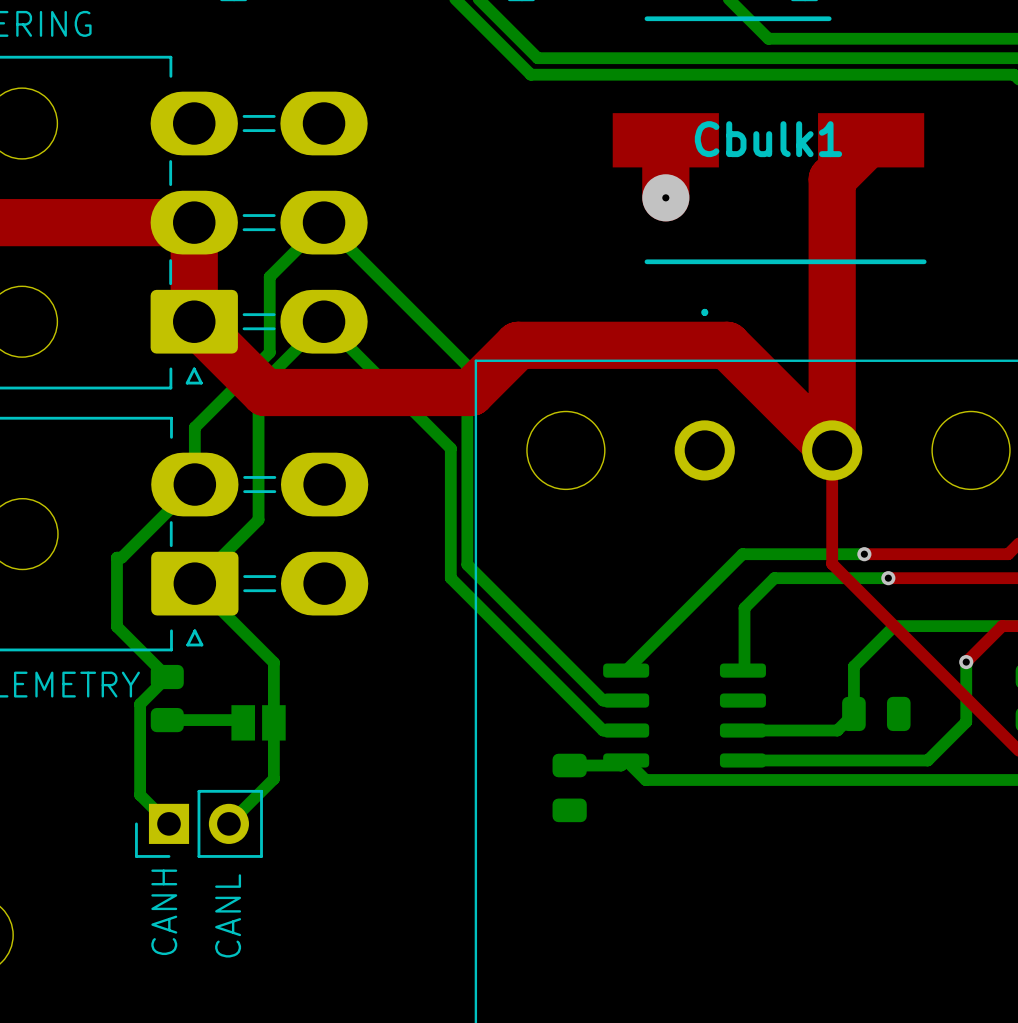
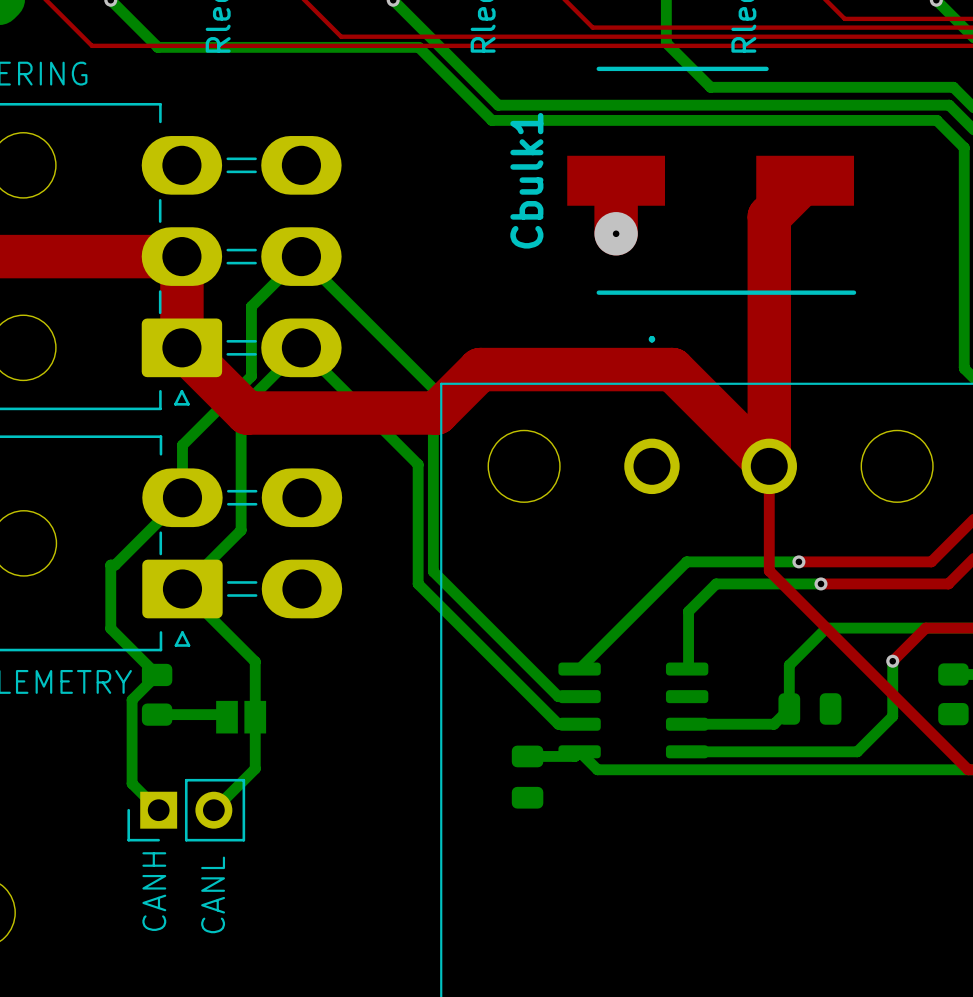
Cbulk1 name rotation: 0° (768, 139) -> 90° counterclockwise (526, 180)
Cbulk1 name position: Cbulk1 (768, 139) -> Cbulk1 (526, 180)

